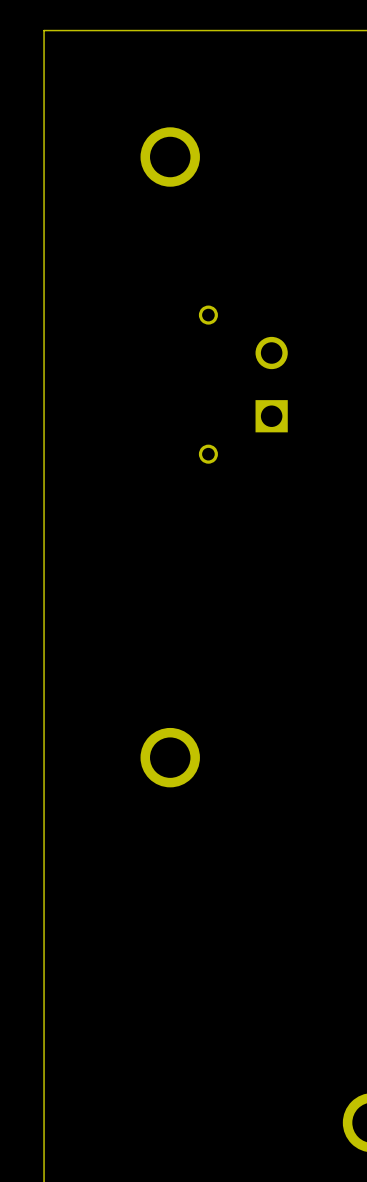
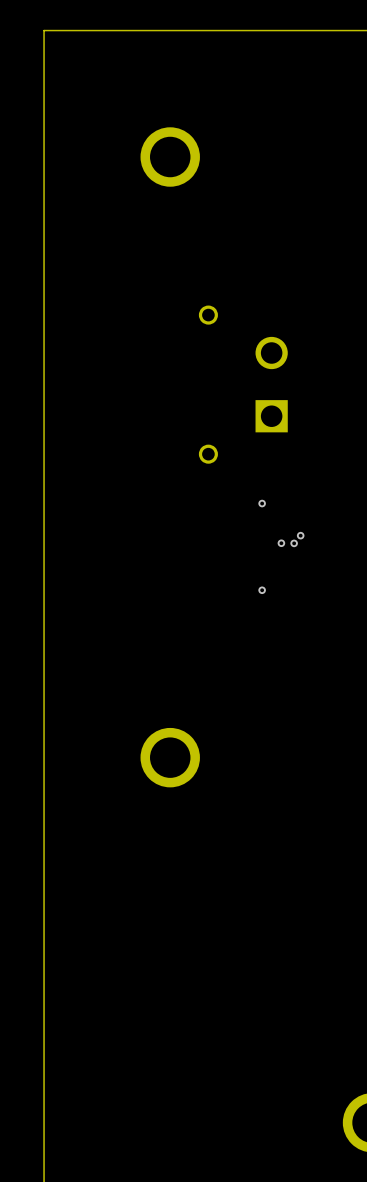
via: none -> (262, 503)
via: none -> (300, 535)
via: none -> (281, 543)
via: none -> (294, 543)
via: none -> (262, 590)

